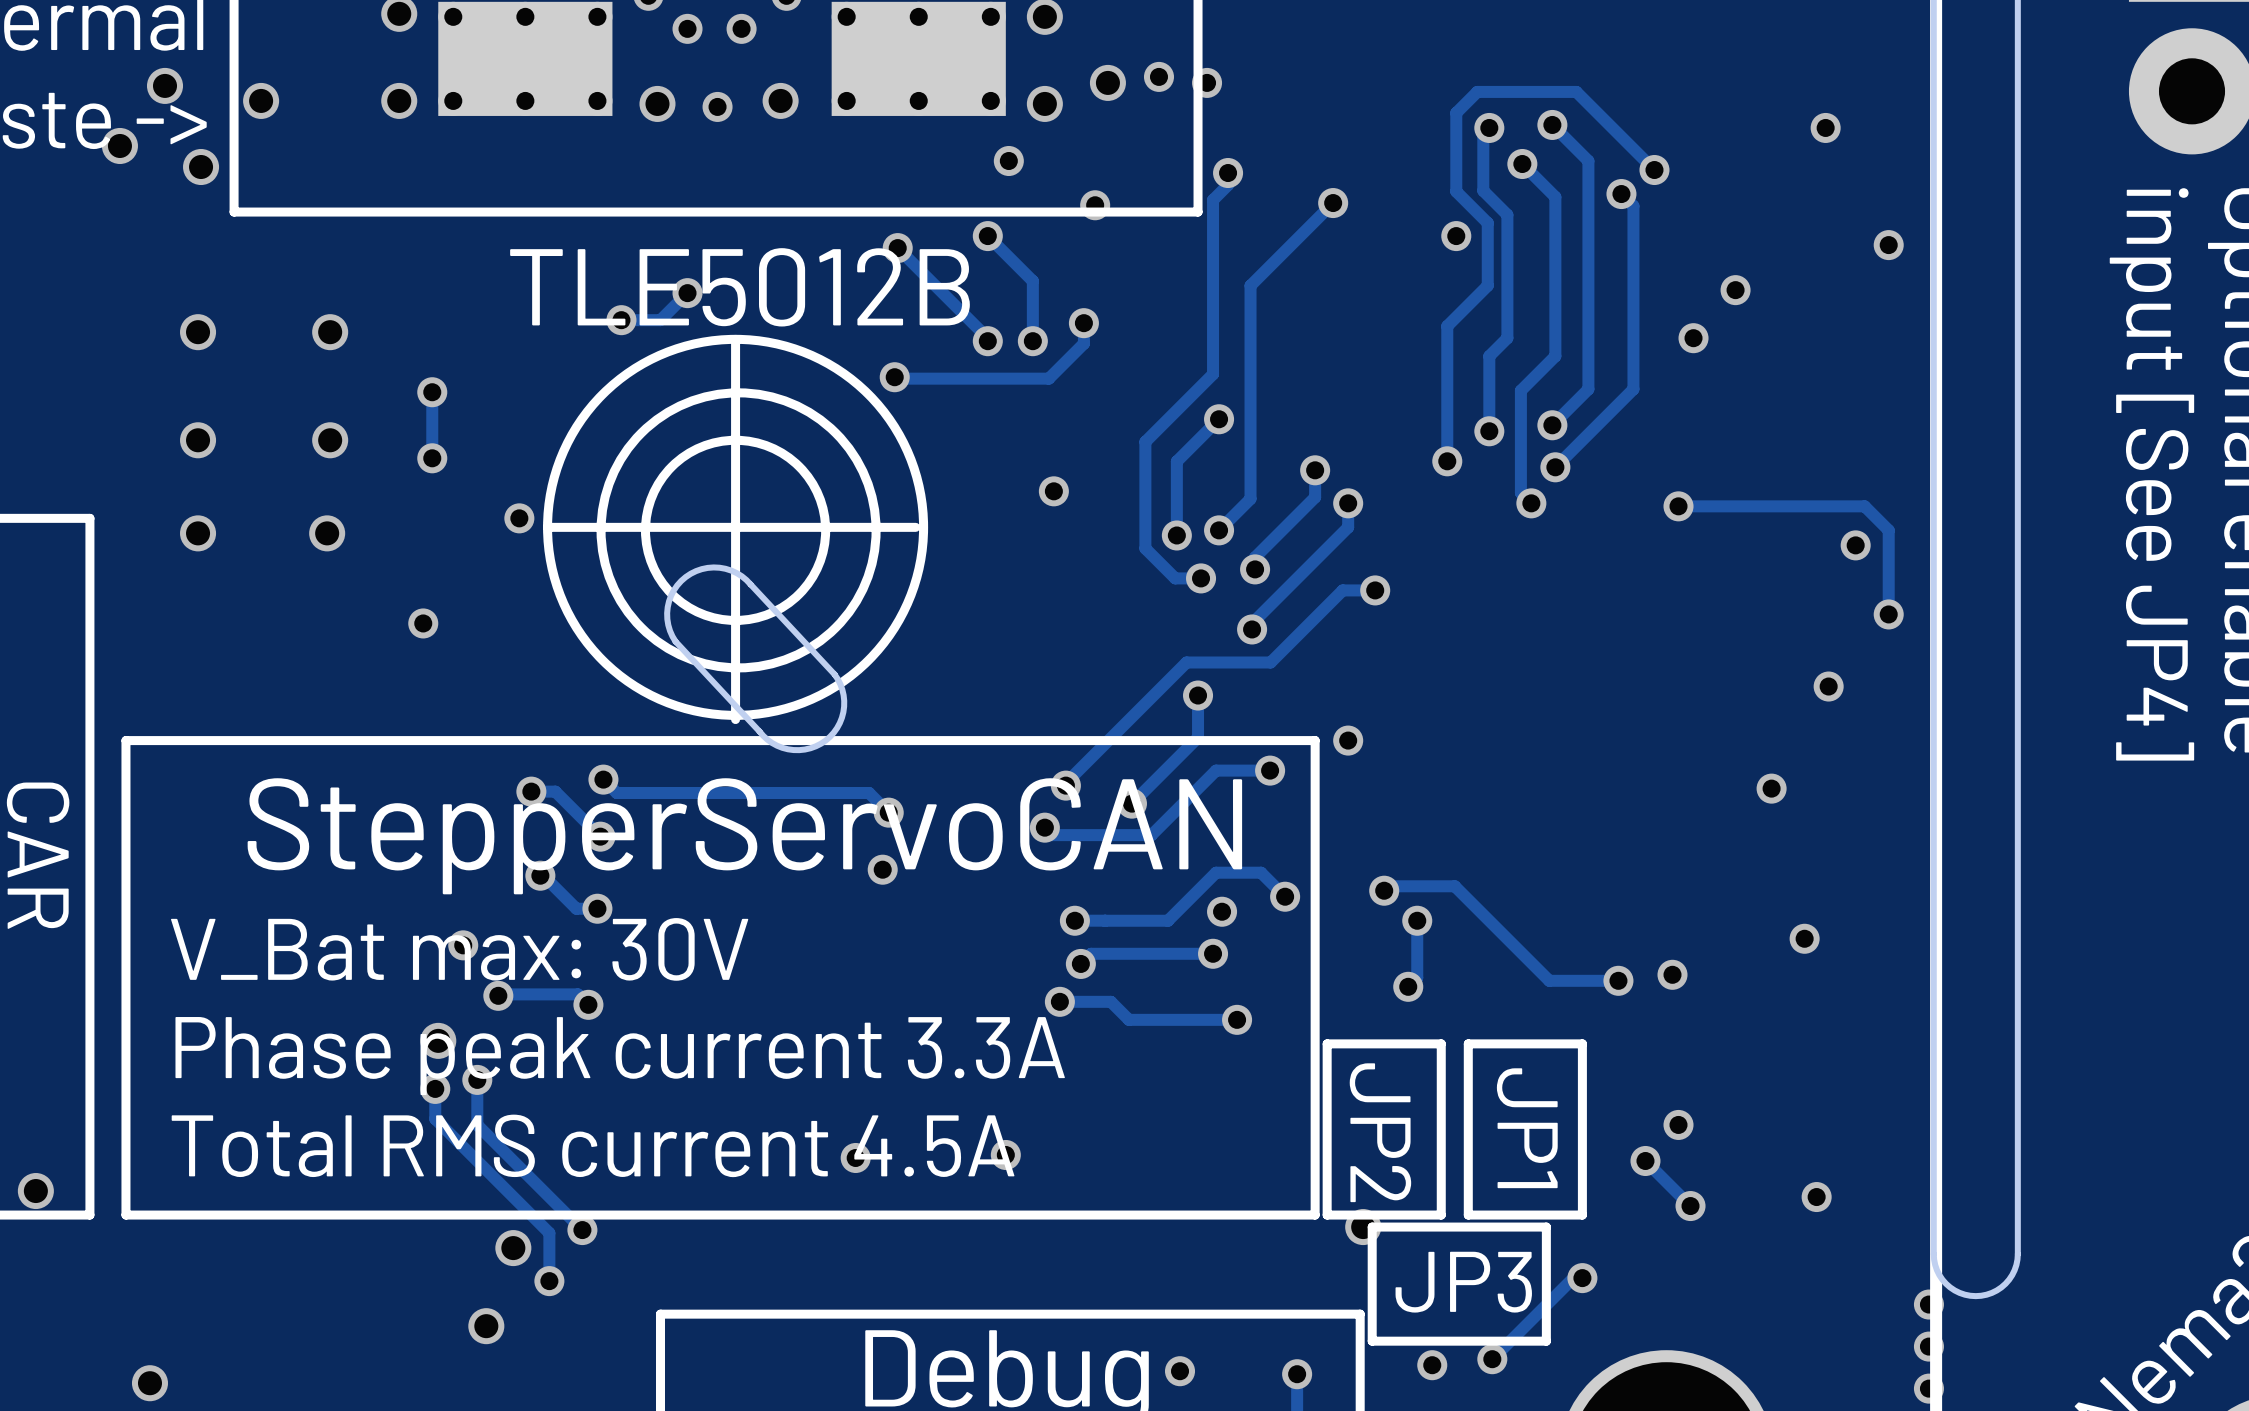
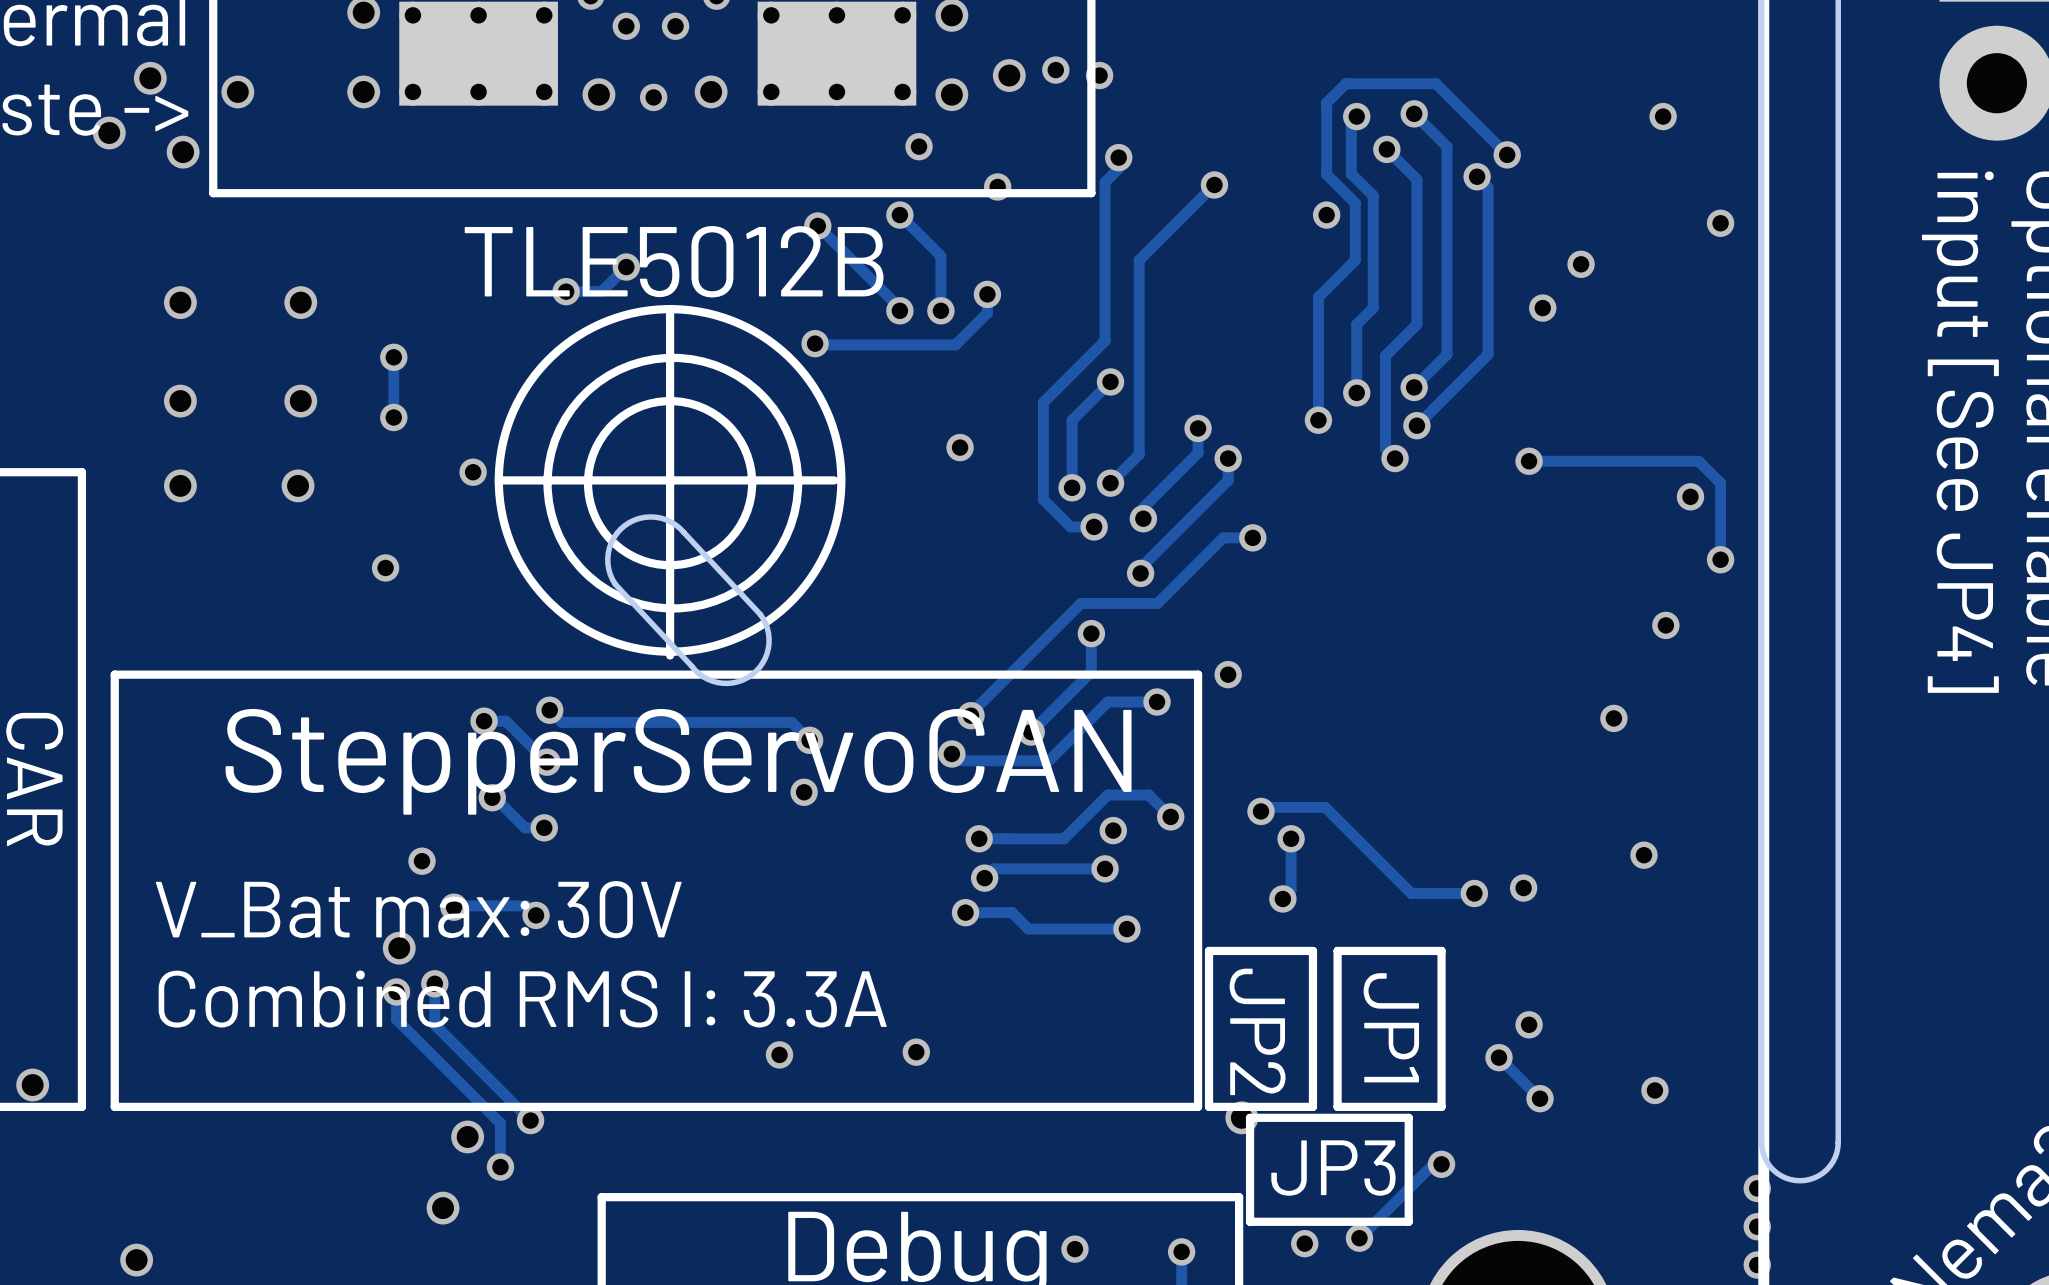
text position: V_Bat max: 30V (459, 949) -> V_Bat max: 30V (418, 909)
text: Phase peak current 3.3A (620, 1056) -> none
text: none -> Combined RMS I: 3.3A (522, 999)
text: Total RMS current 4.5A (593, 1145) -> none

